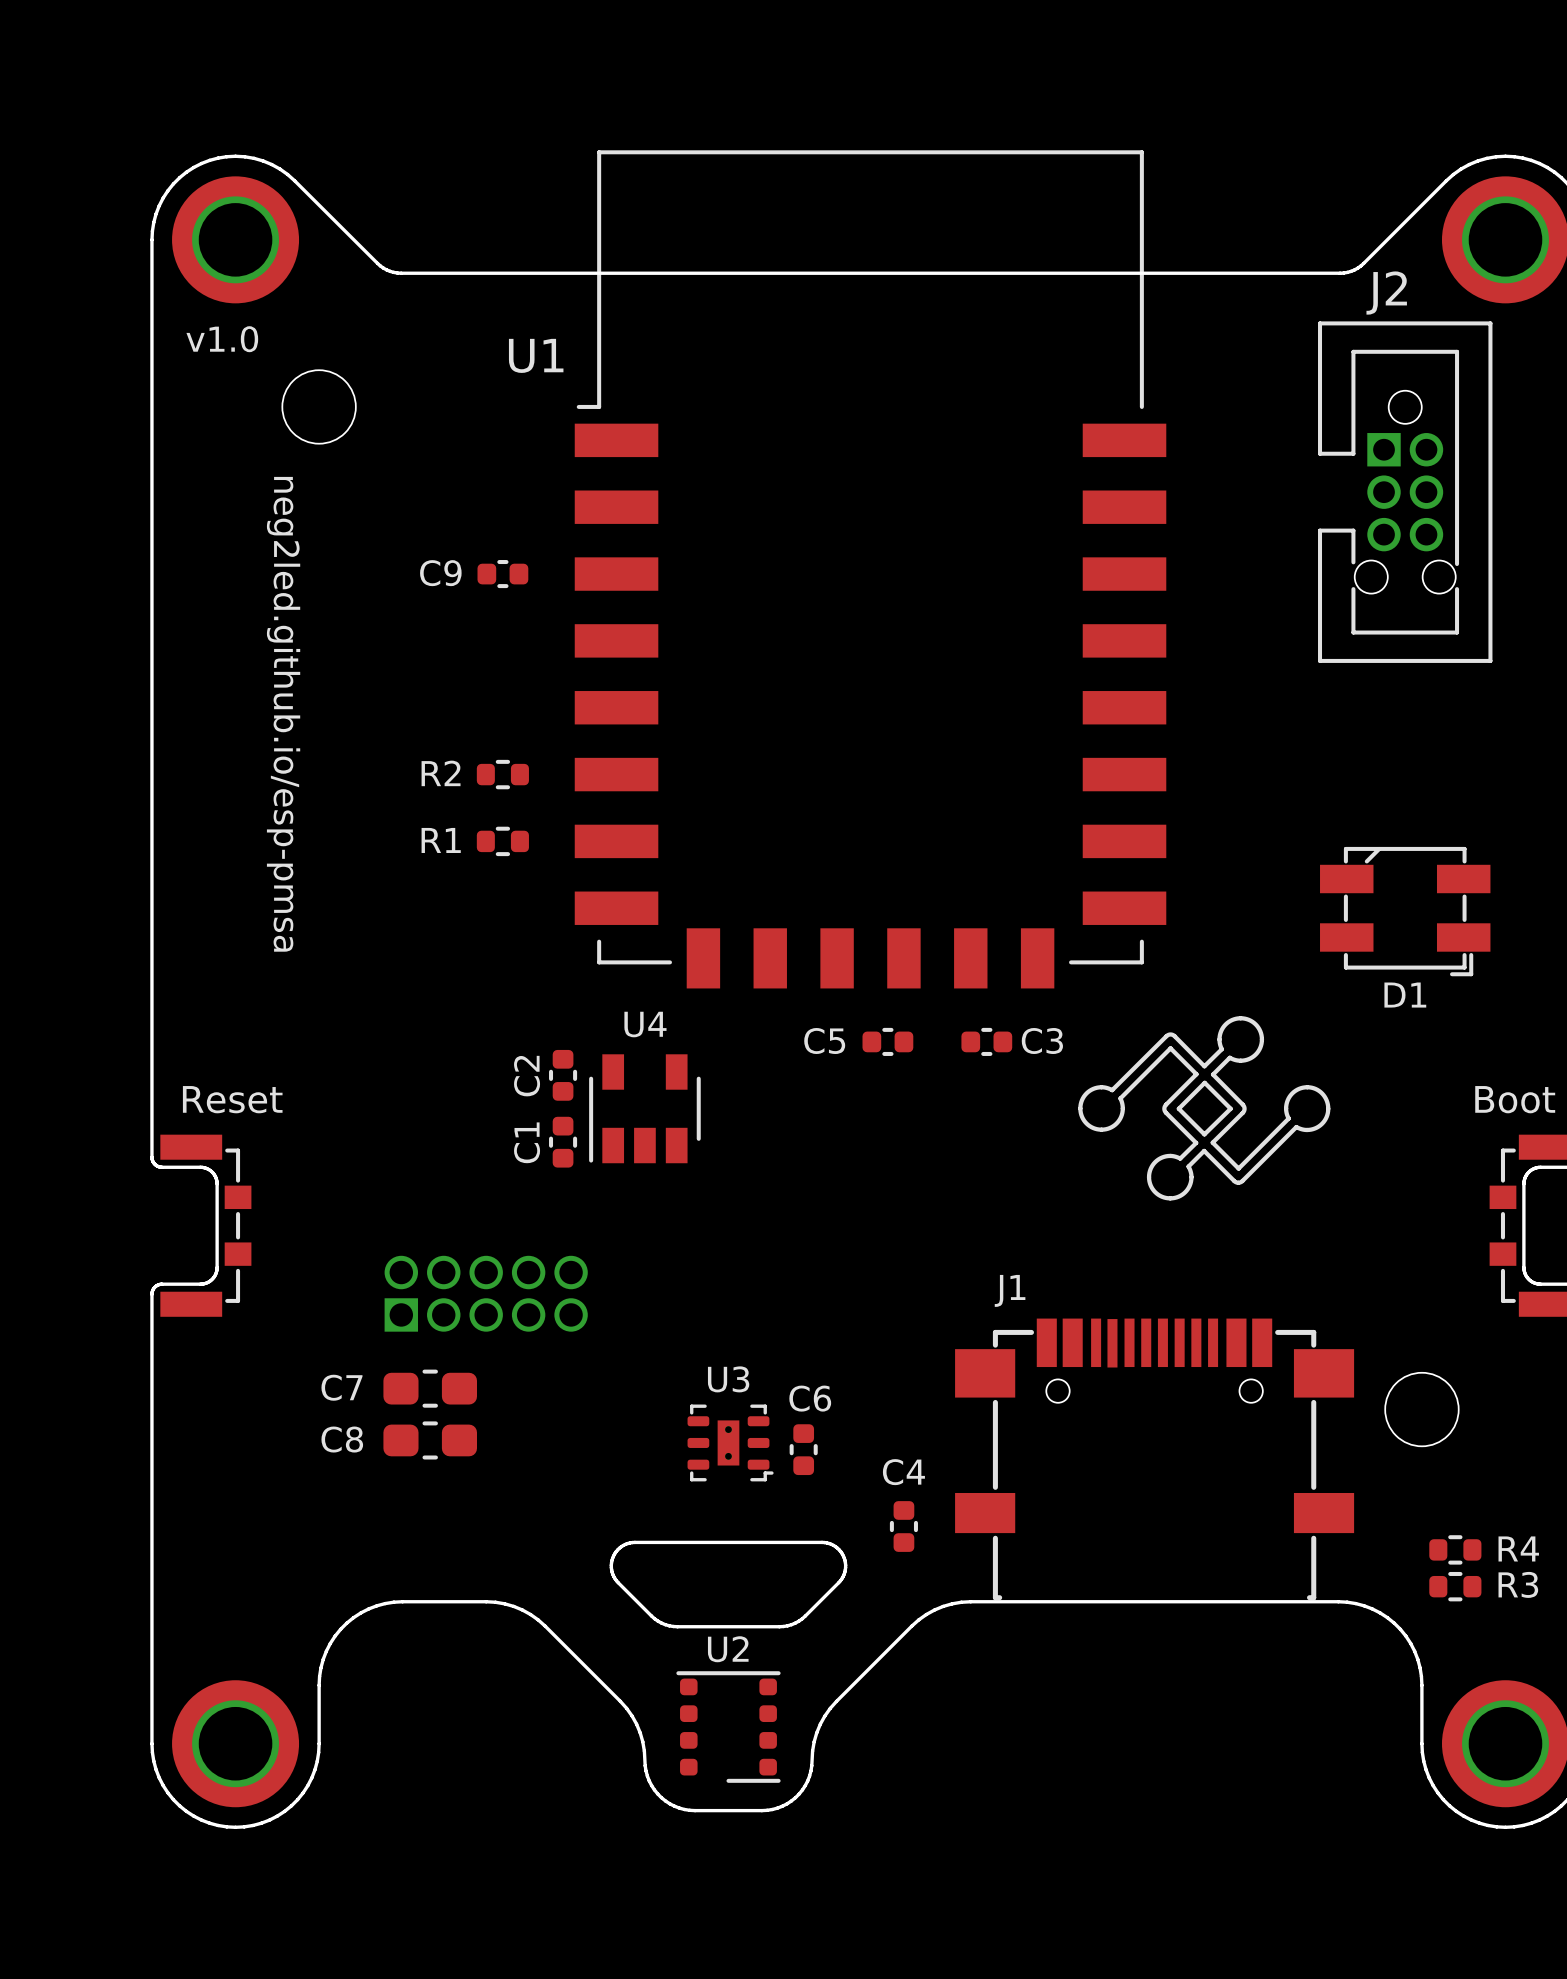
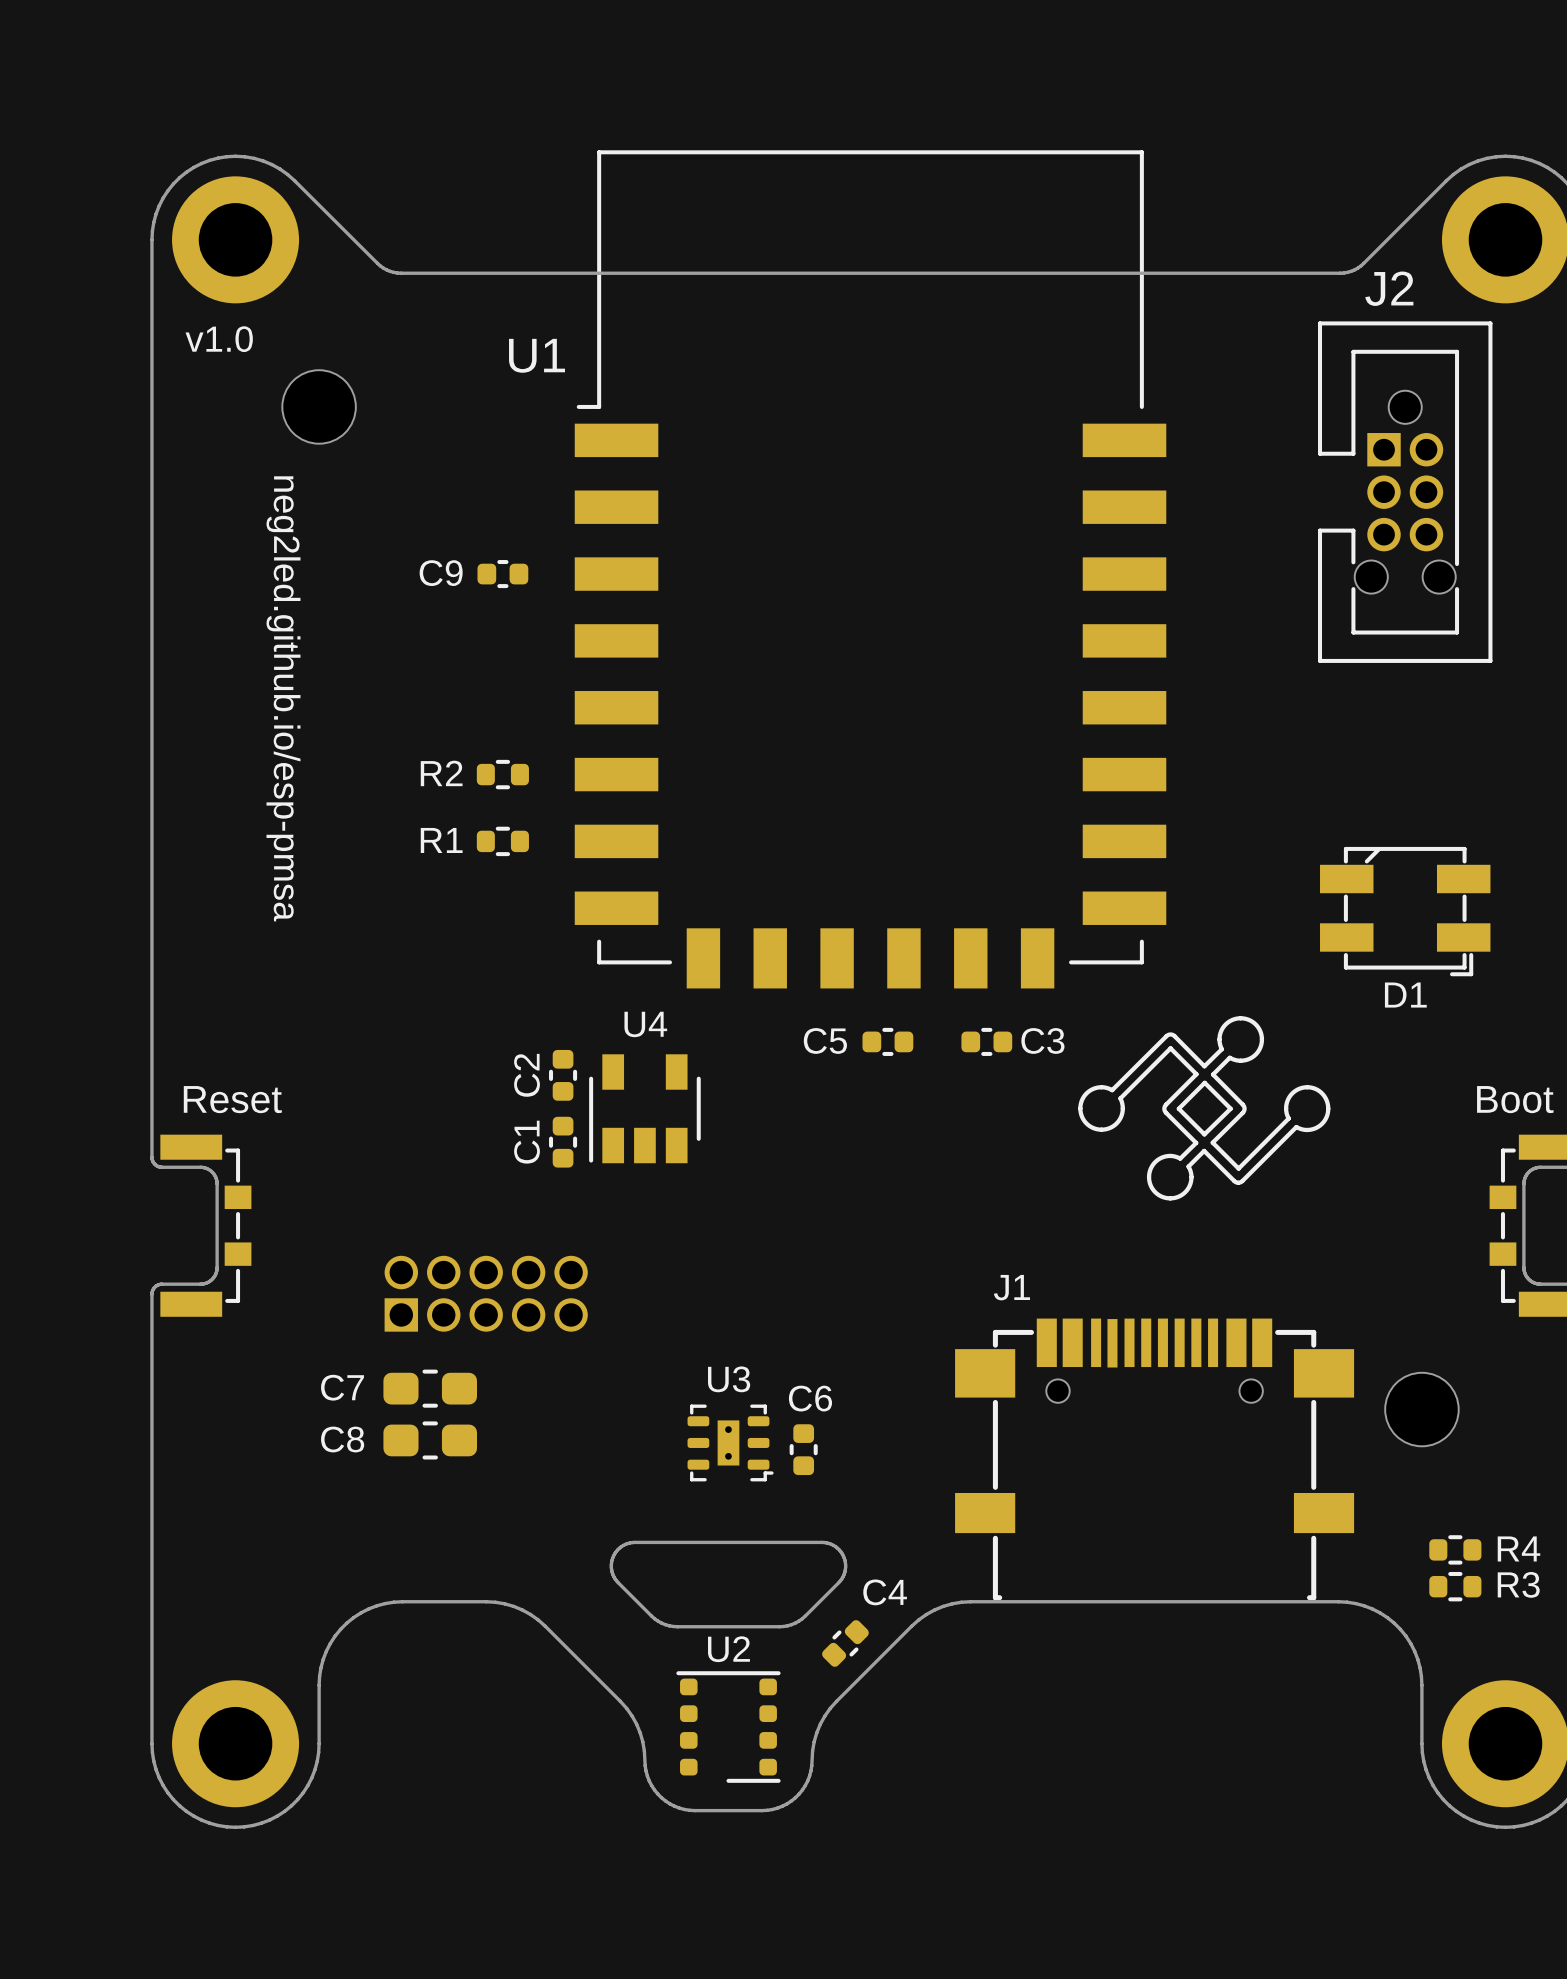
C4 rotation: 0° (903, 1526) -> 45° clockwise (845, 1643)
C4 position: (903, 1526) -> (845, 1643)

